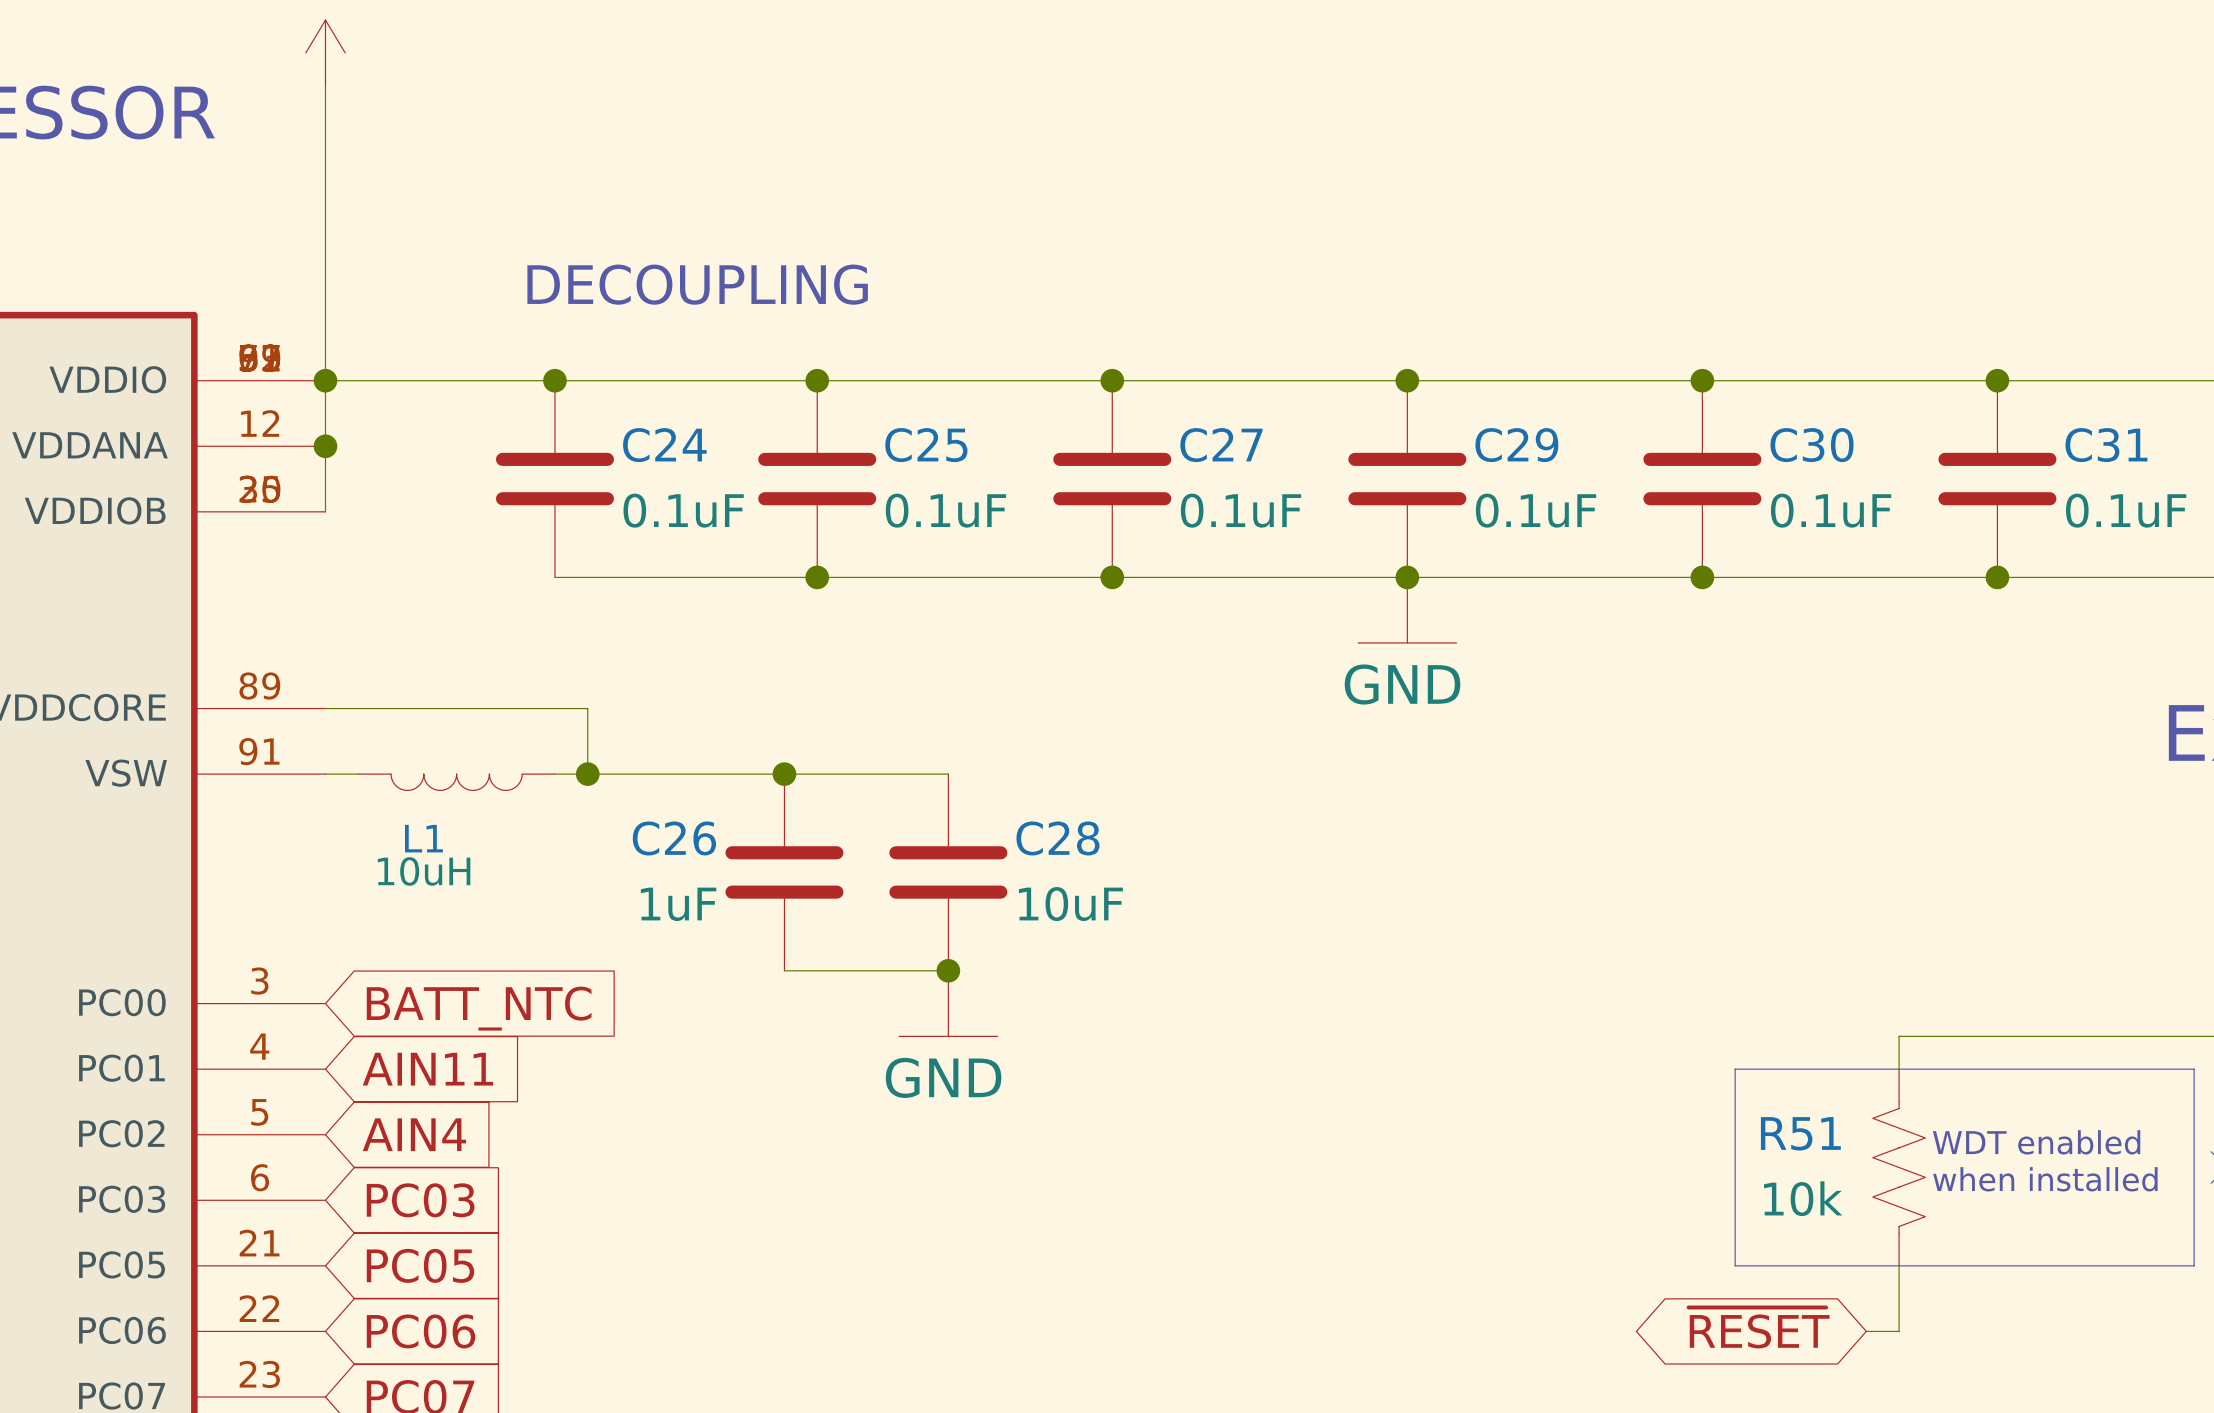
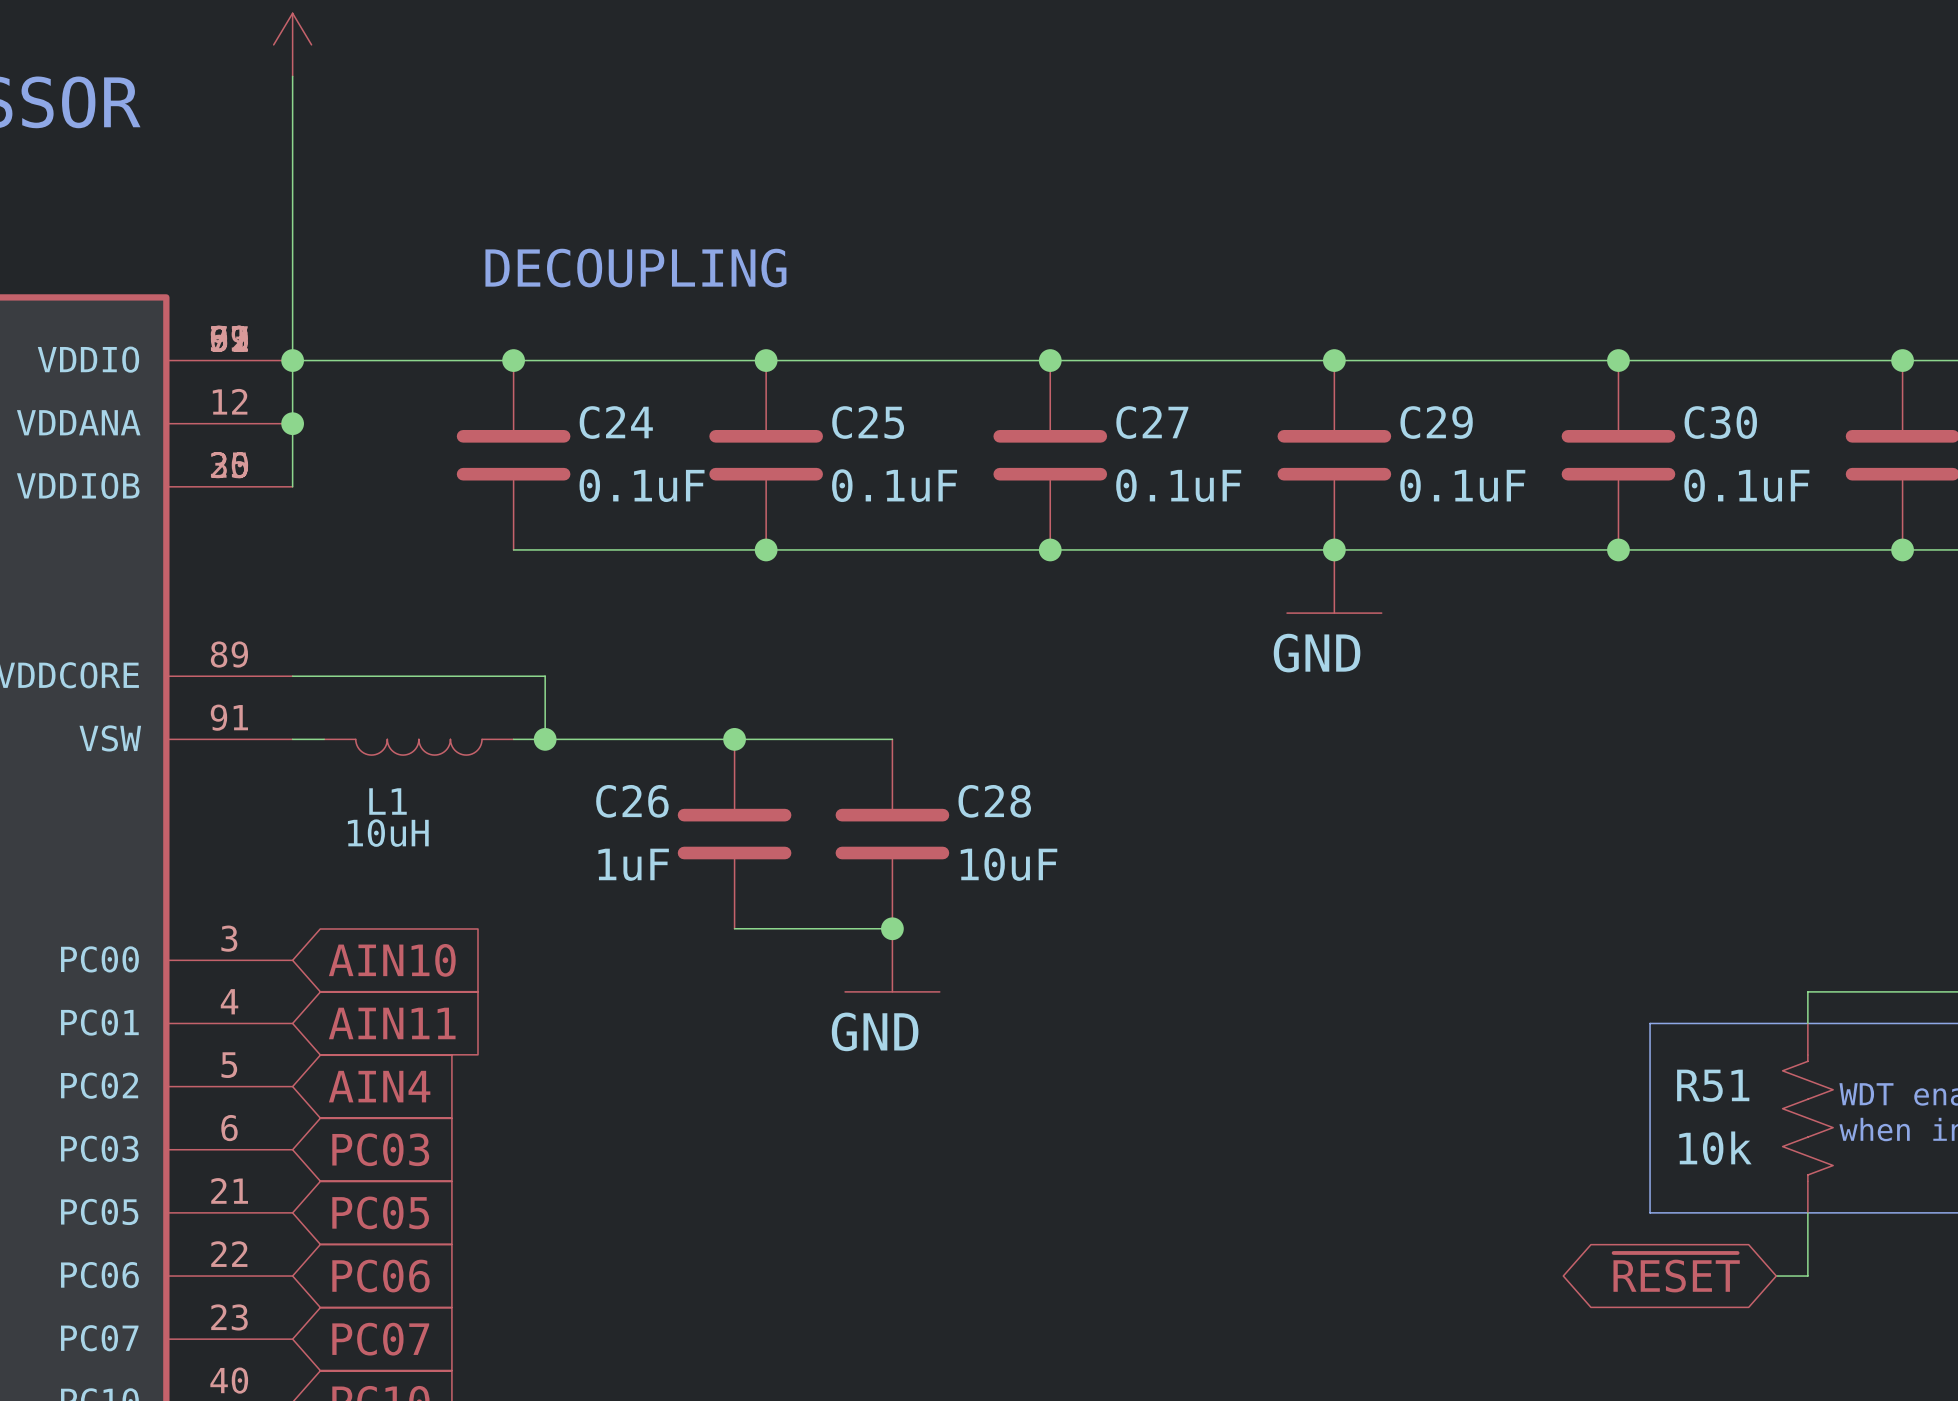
global label: BATT_NTC (479, 1008) -> AIN10 (392, 960)

